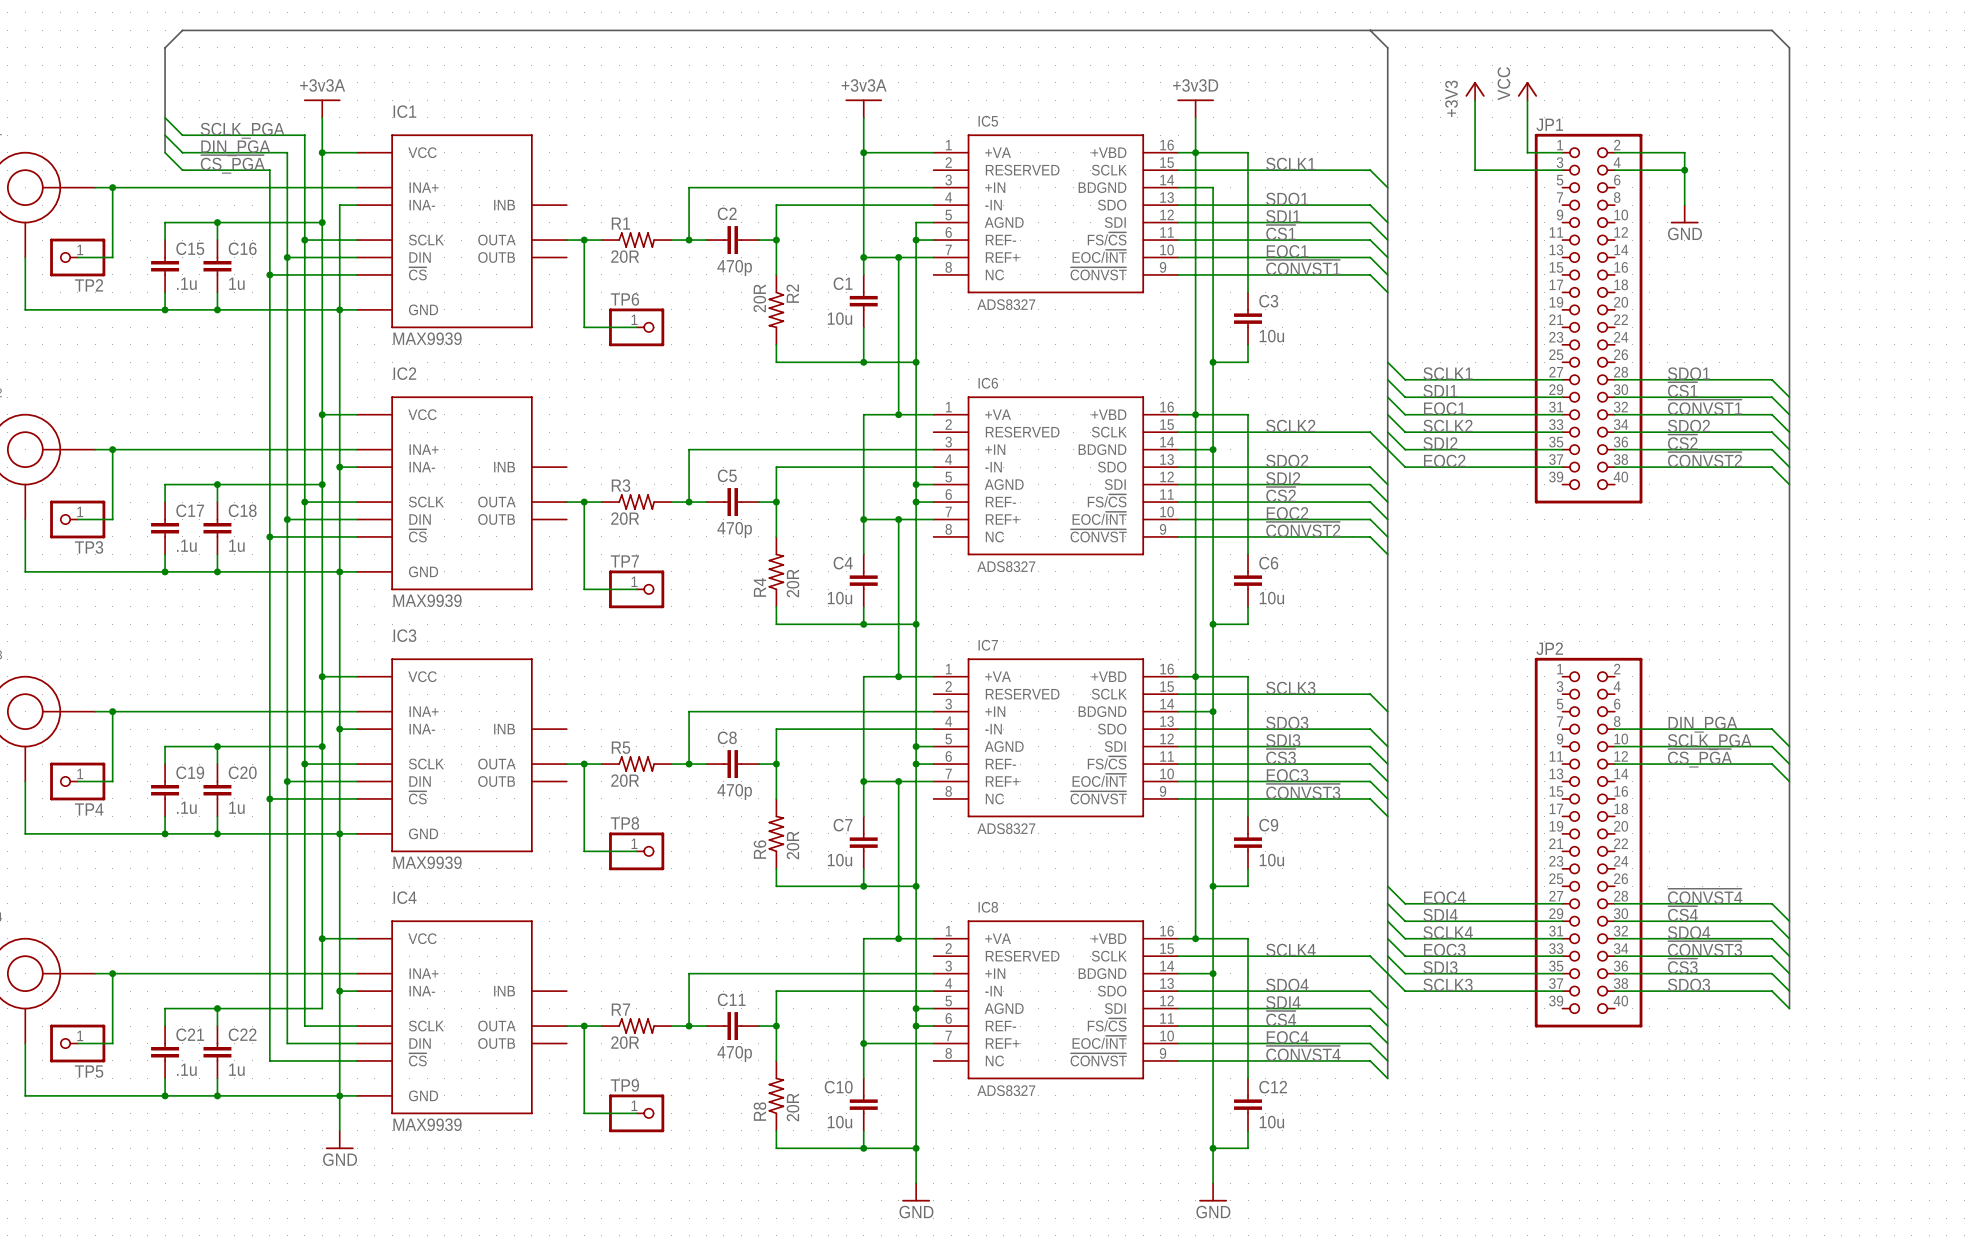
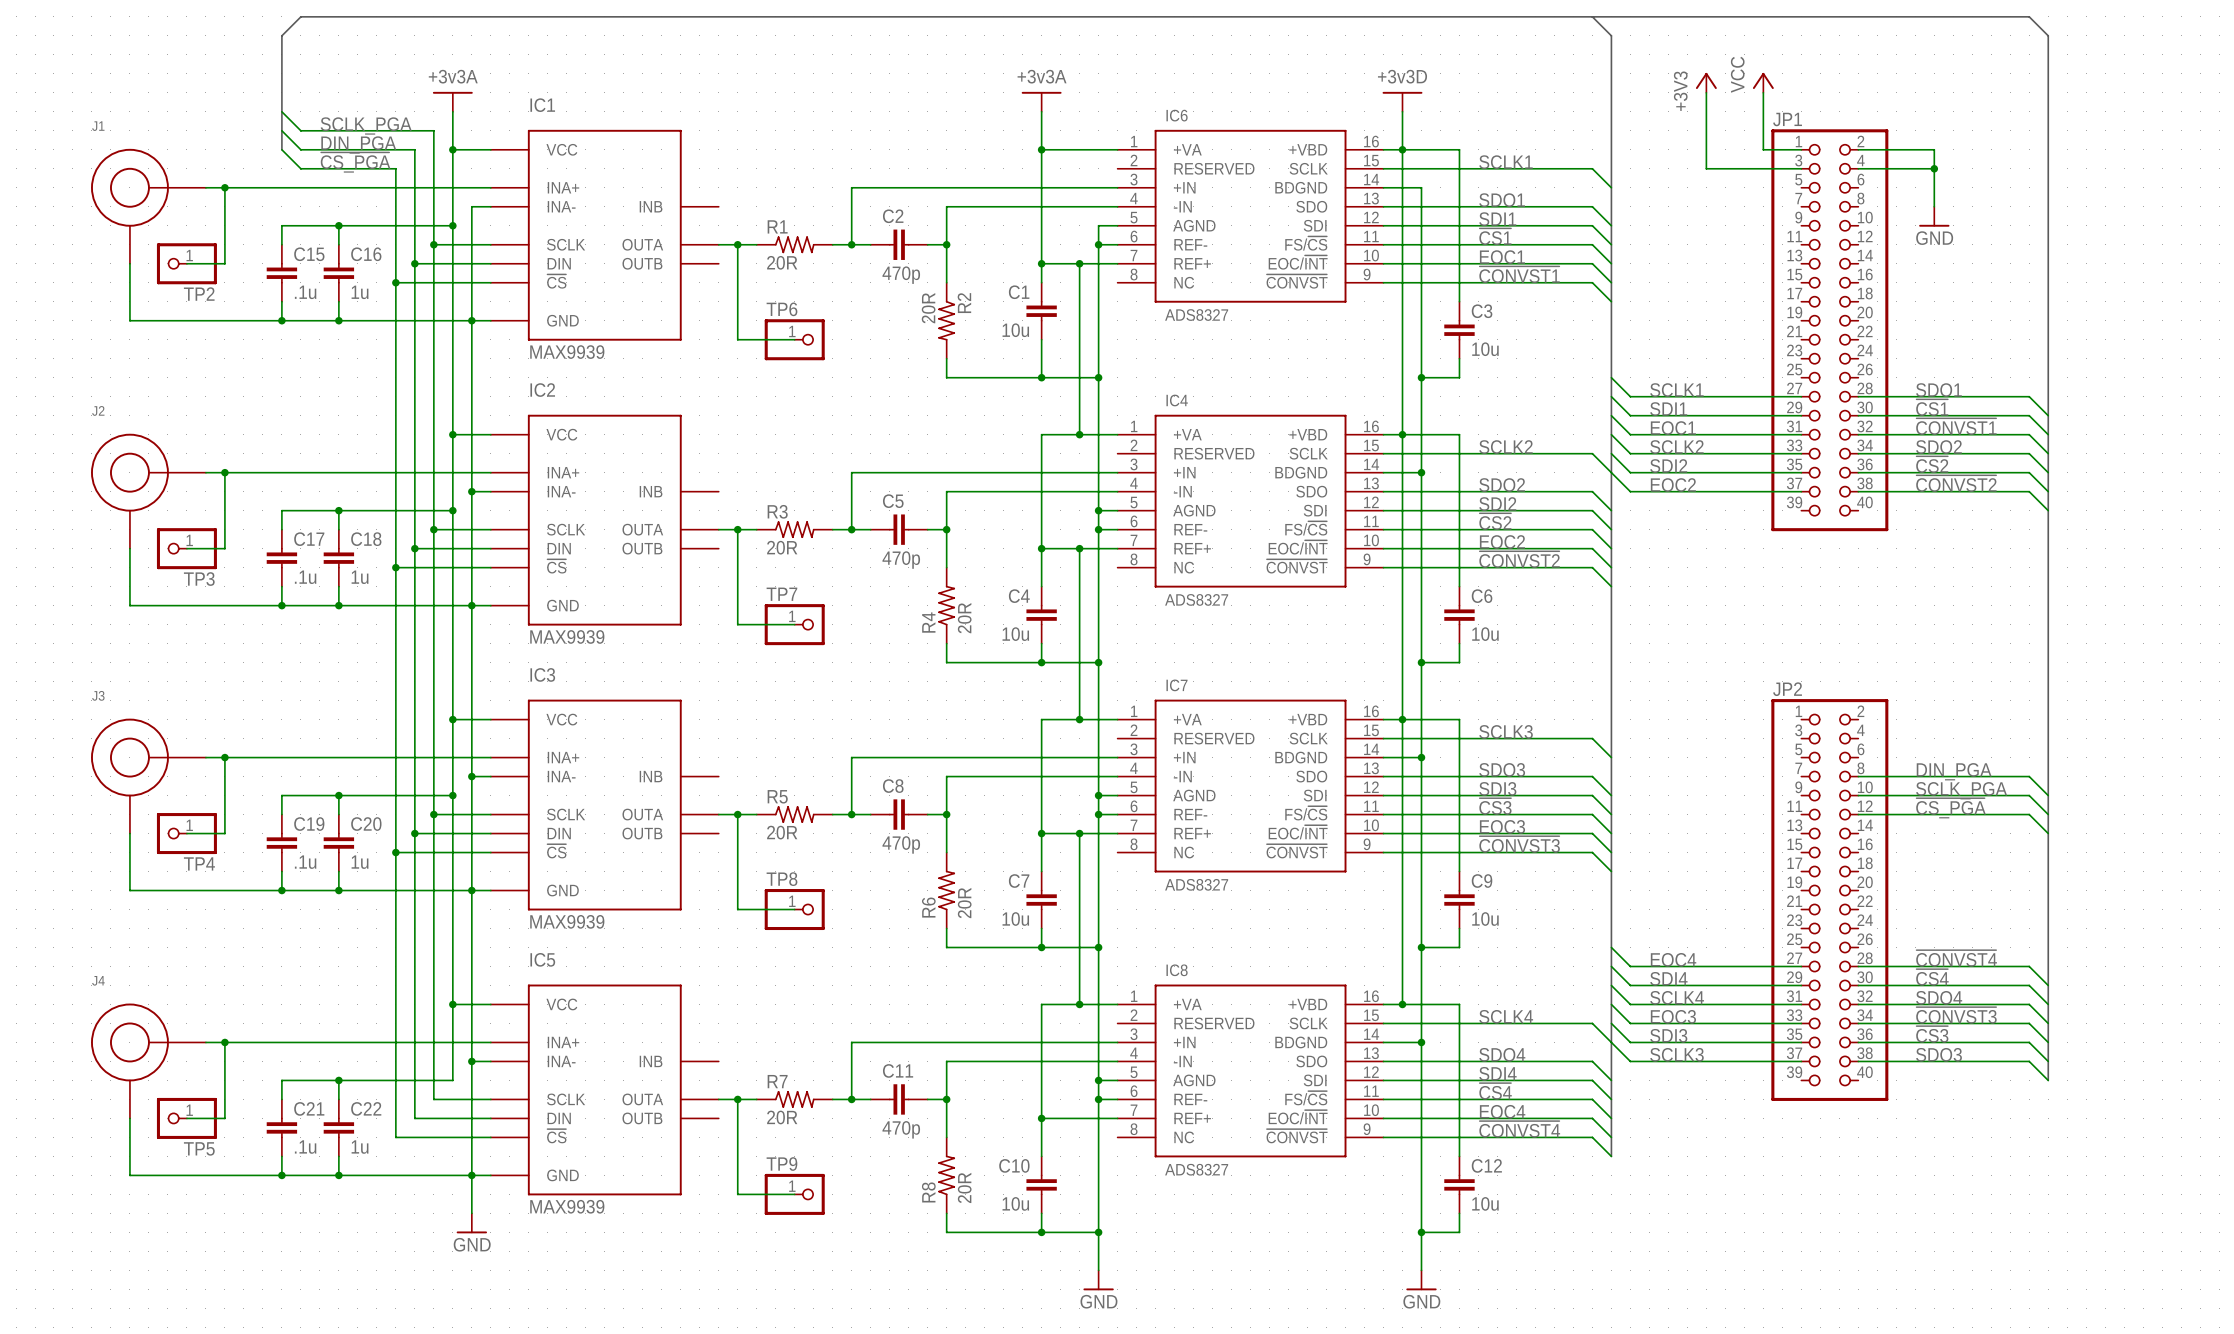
IC5 name: IC5 (988, 121) -> IC6 (1177, 115)
IC6 name: IC6 (988, 383) -> IC4 (1177, 400)
IC4 name: IC4 (405, 897) -> IC5 (542, 959)

